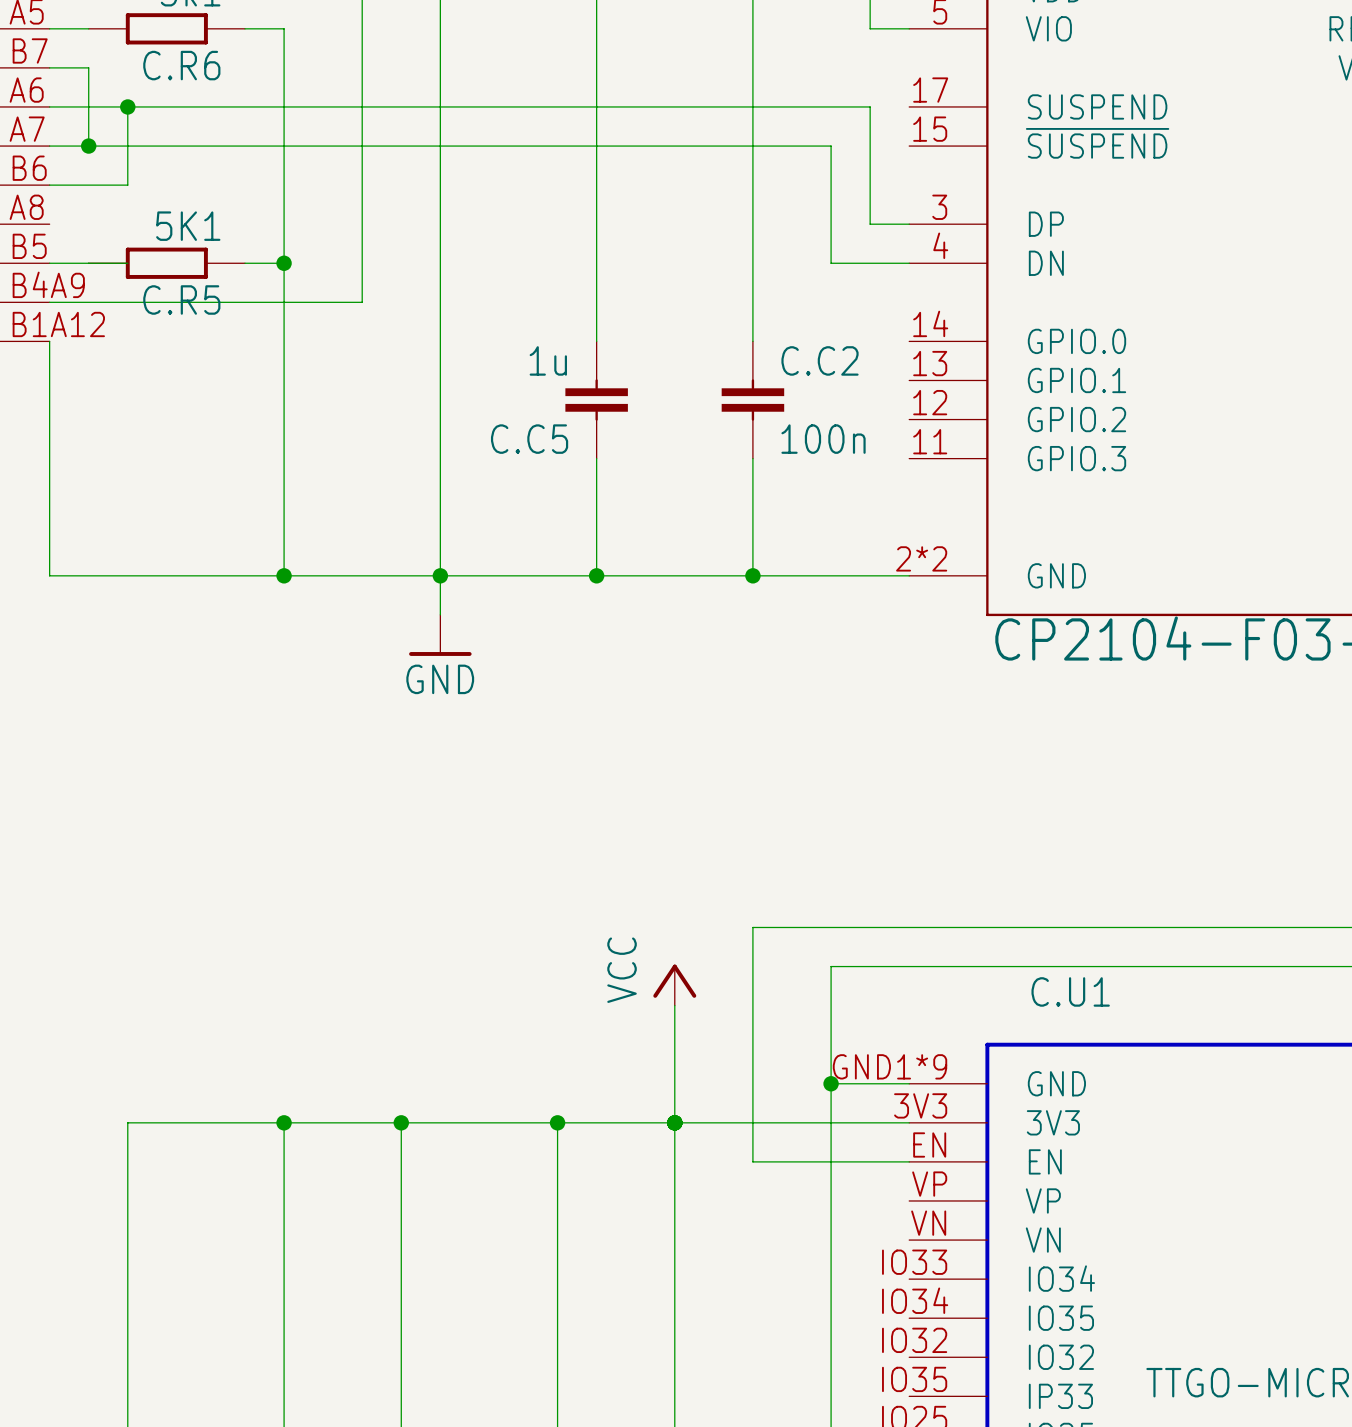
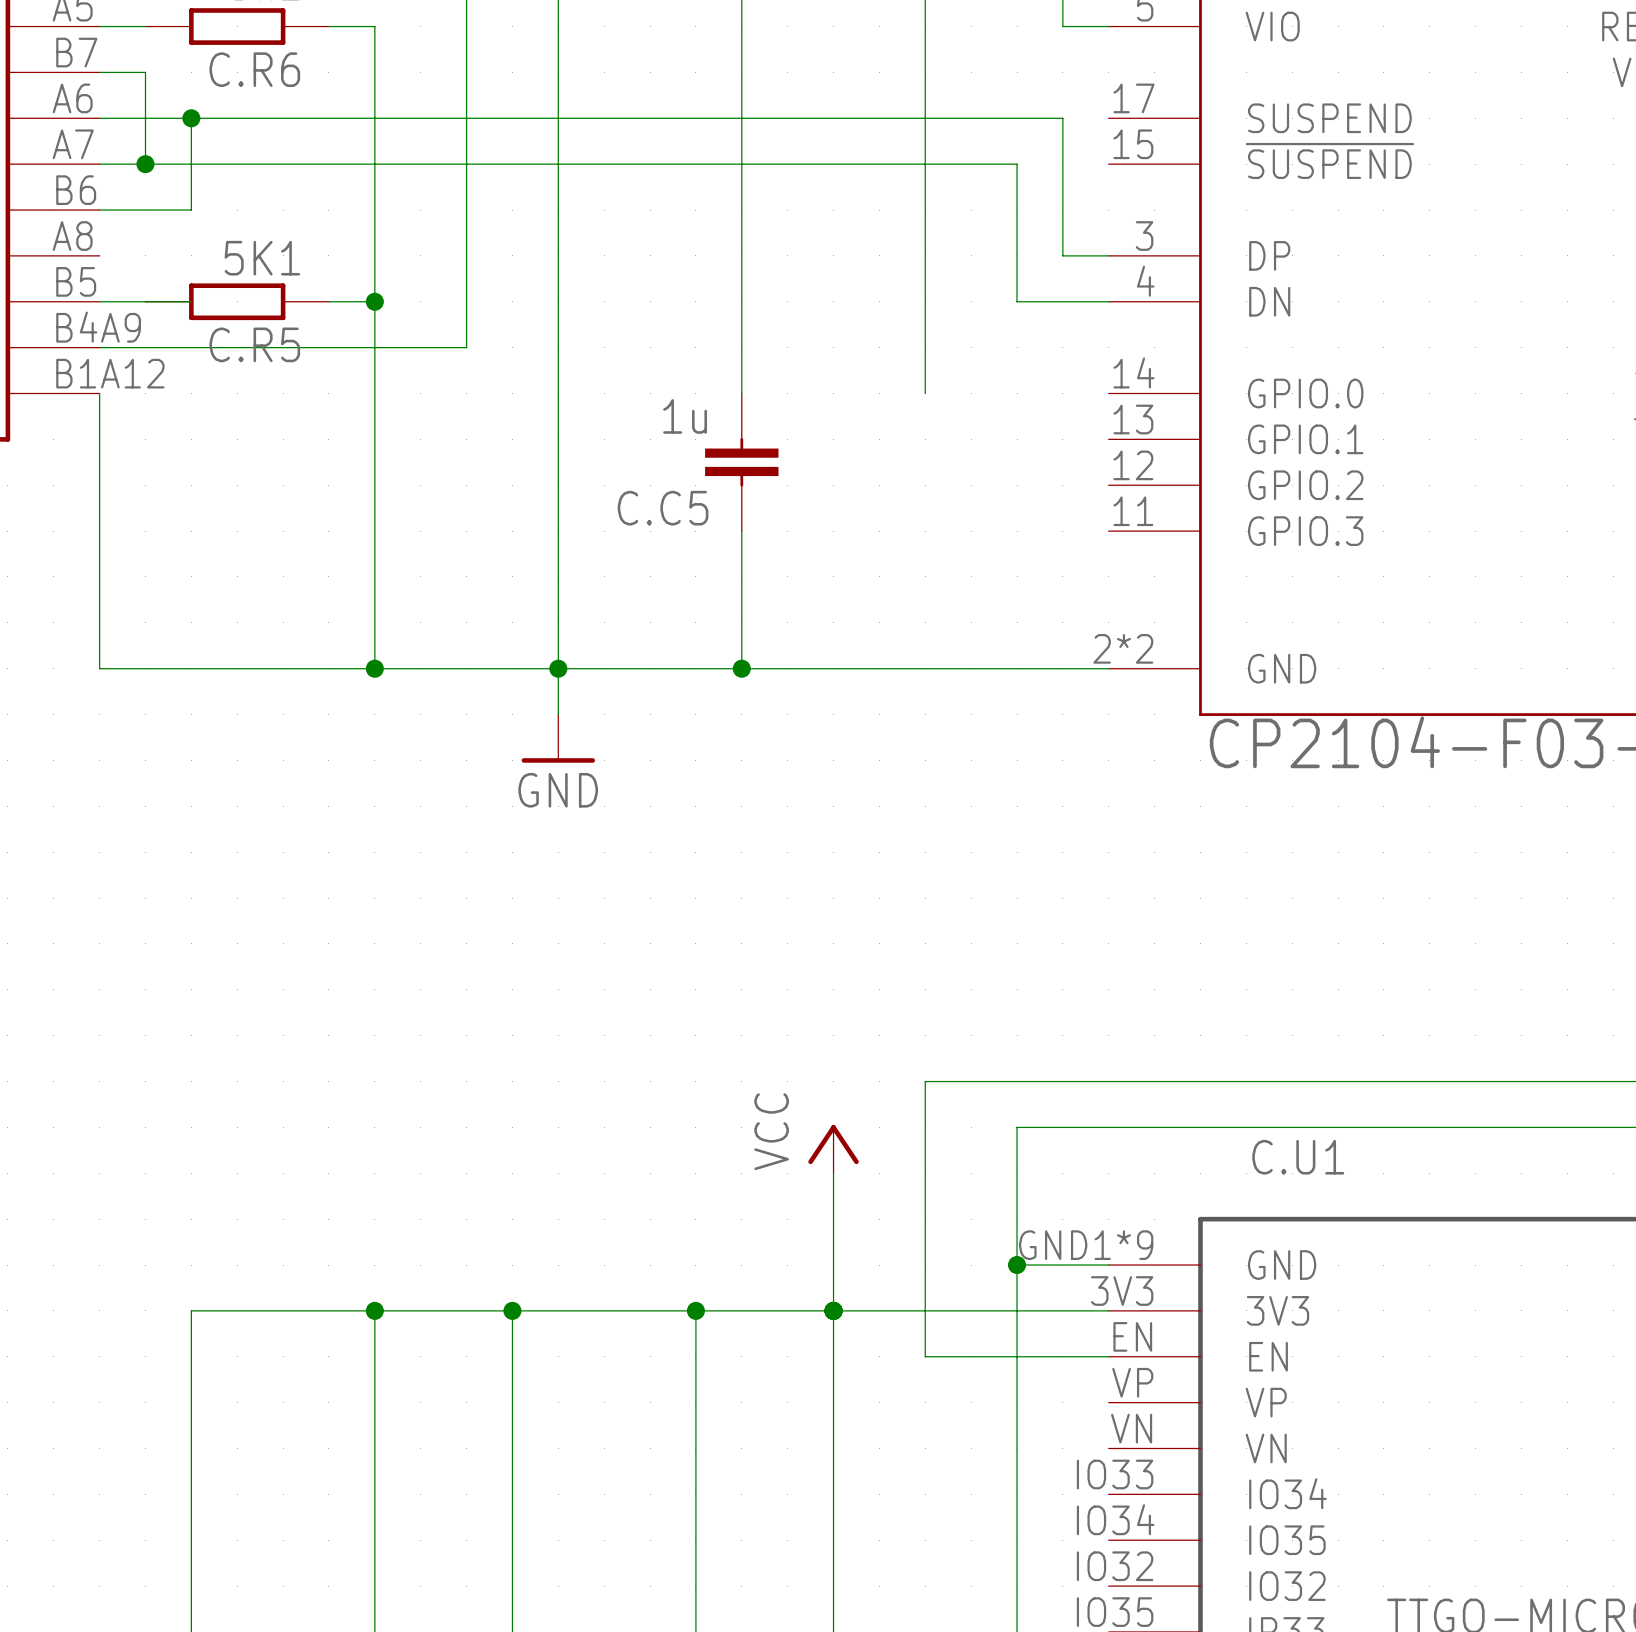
C.C2: 100n (752, 400) -> none
wire: (752, 458) (752, 575) -> none
junction: (752, 575) -> none

